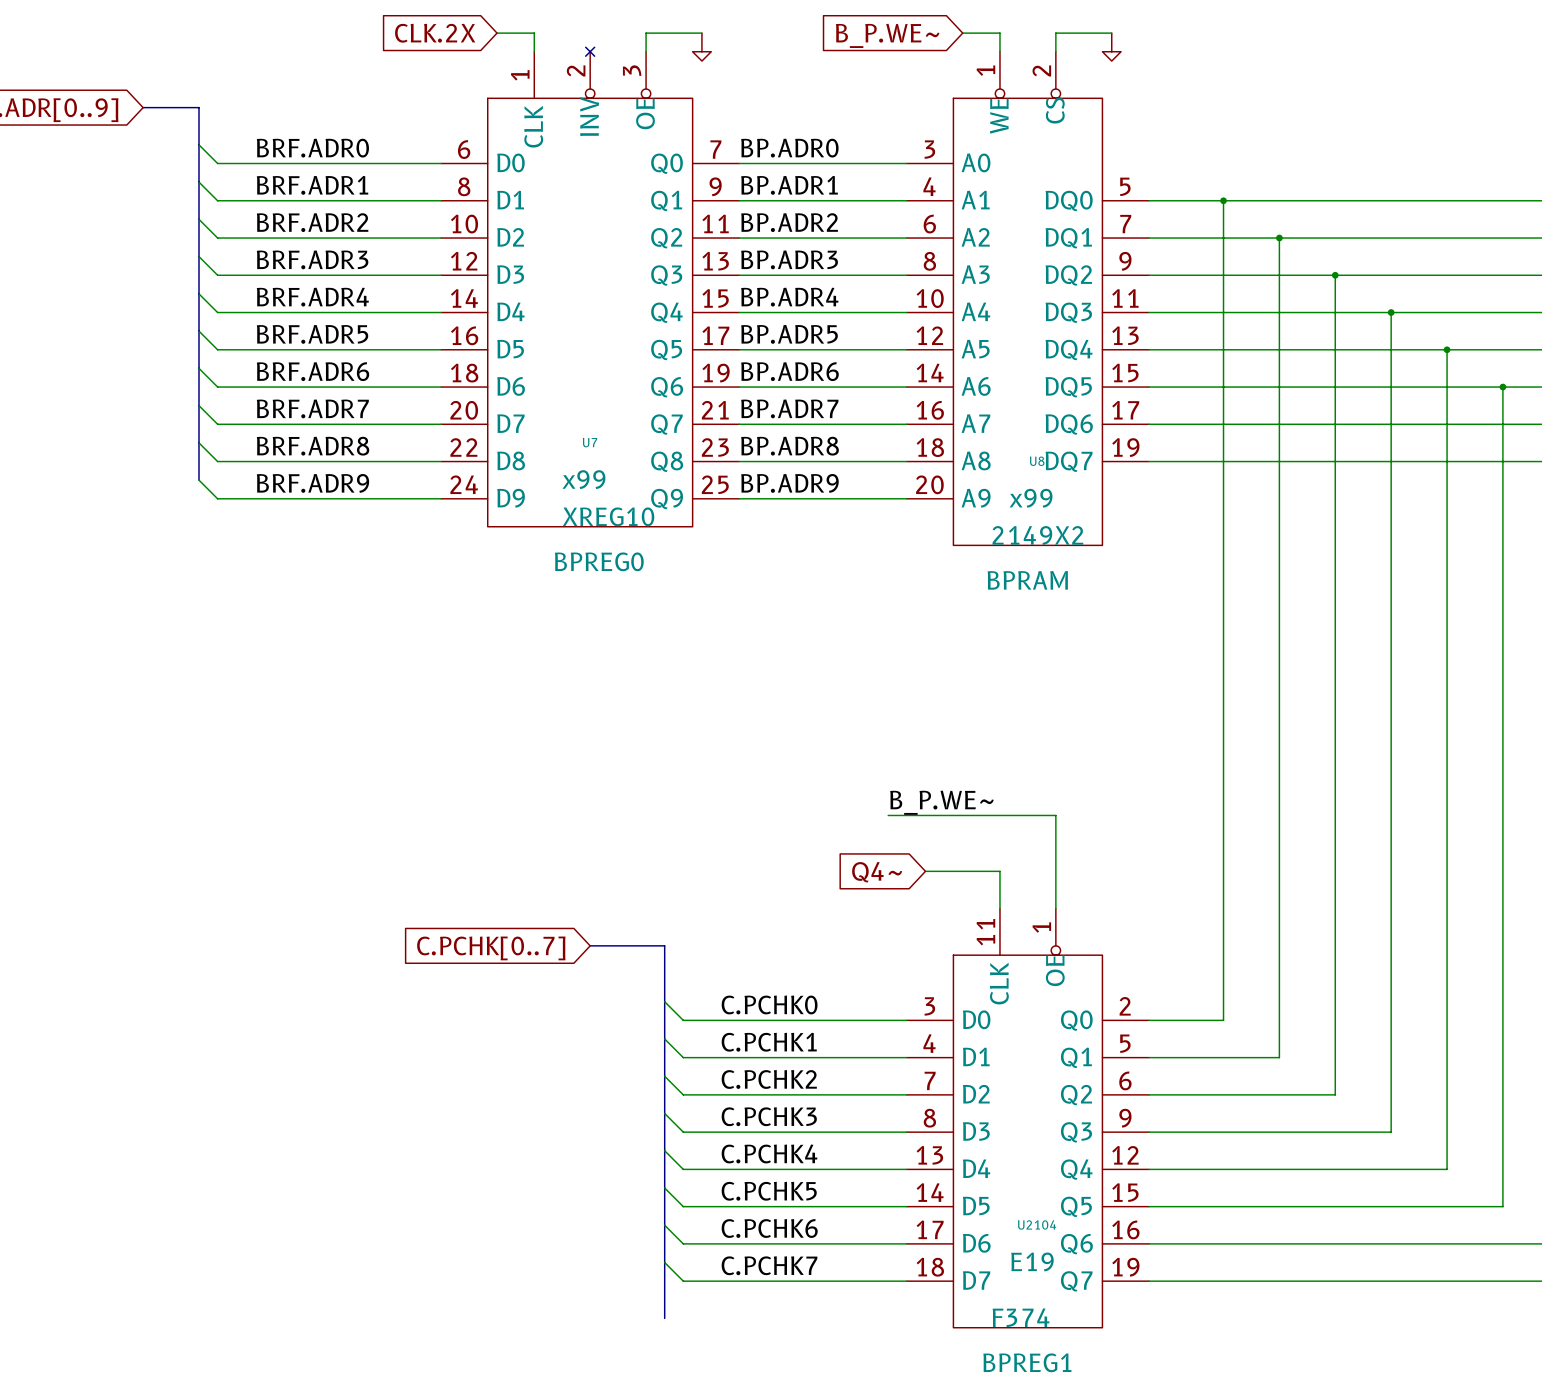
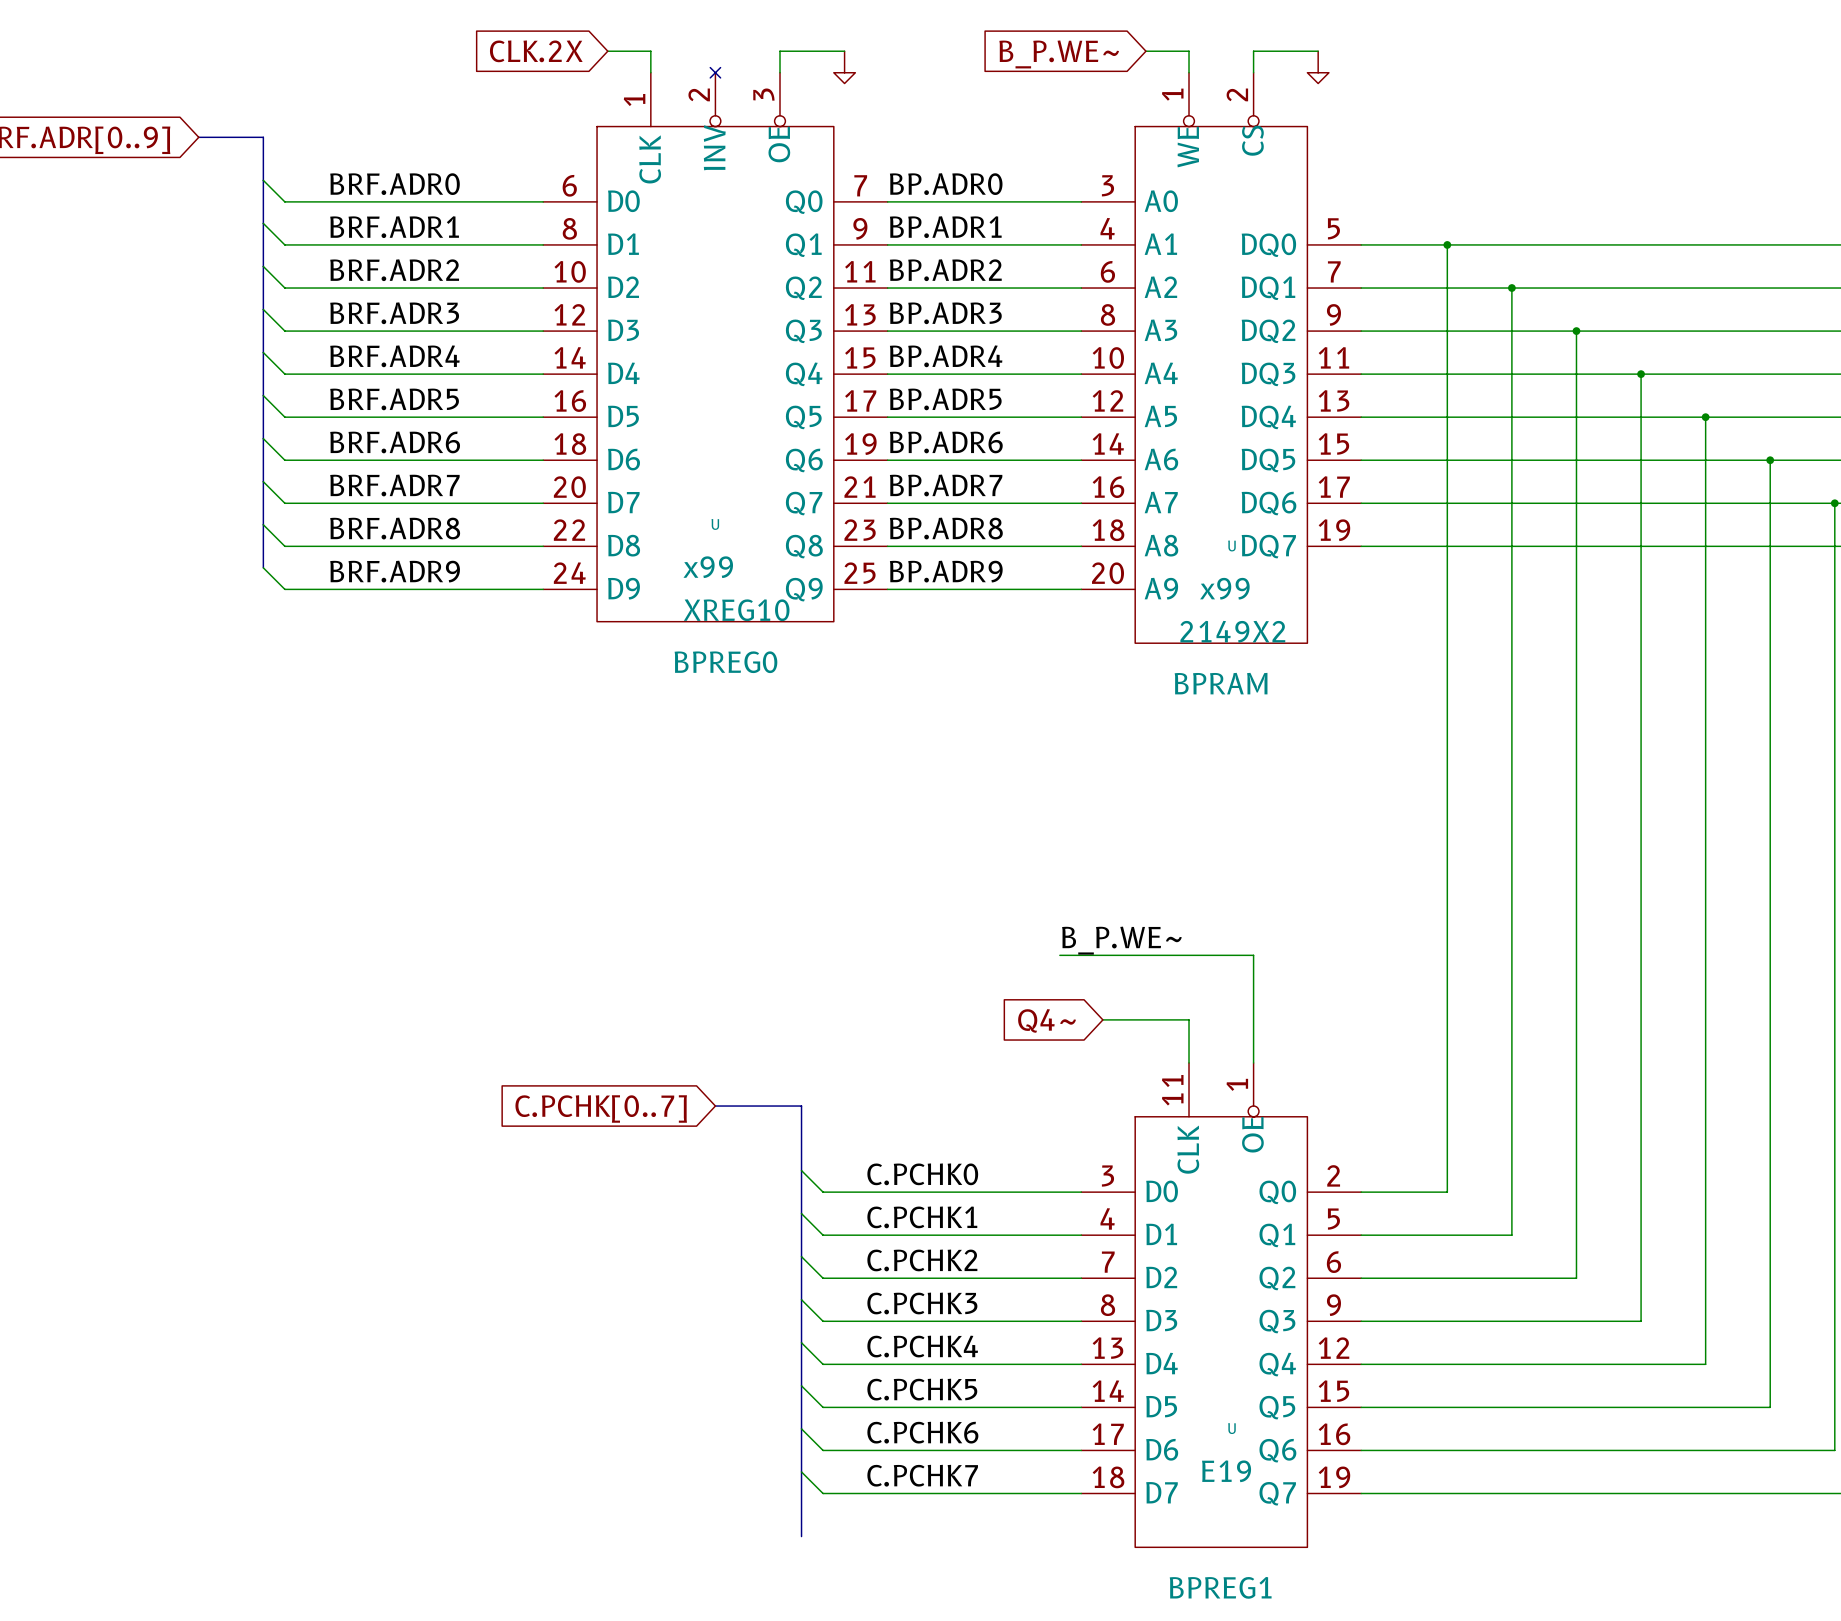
U7 name: U7 (590, 442) -> U (715, 524)
U8 name: U8 (1037, 461) -> U (1231, 545)
U2104 name: U2104 (1037, 1224) -> U (1231, 1428)
U2104 value: F374 (1021, 1317) -> none

